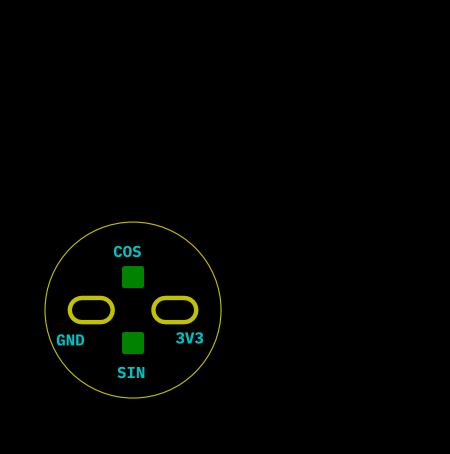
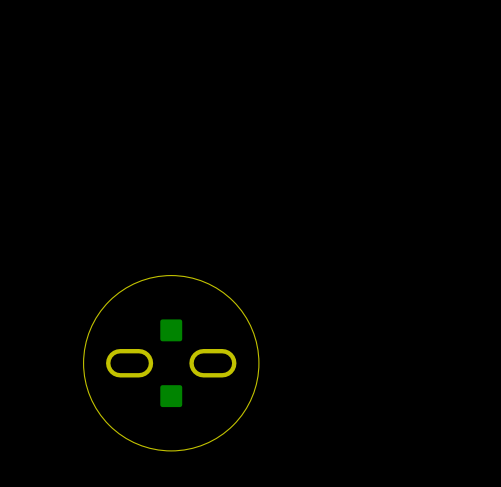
text: COS (127, 251) -> none
text: 3V3 (189, 337) -> none
text: GND (70, 339) -> none
text: SIN (130, 372) -> none

